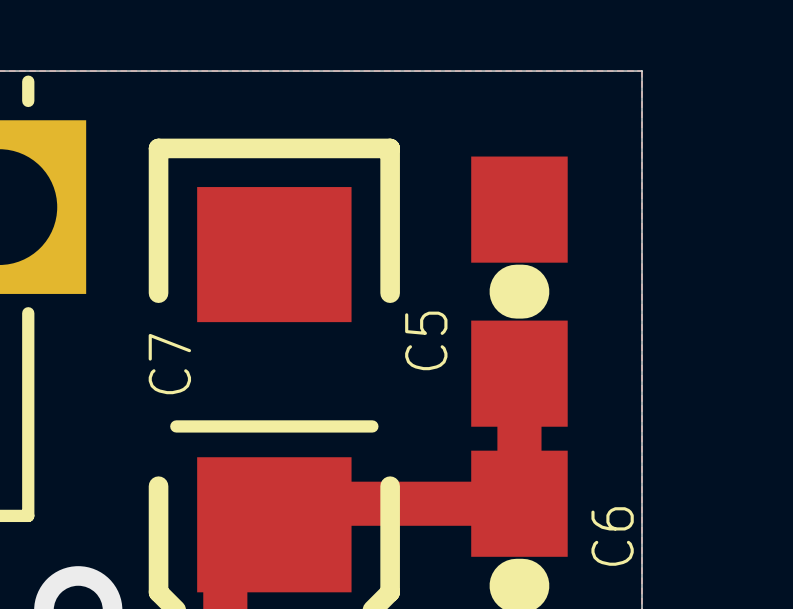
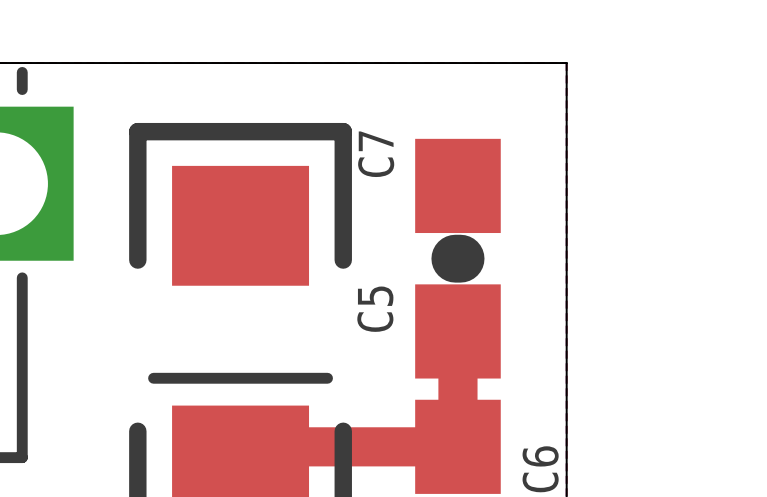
C7 name position: C7 (169, 364) -> C7 (376, 154)

